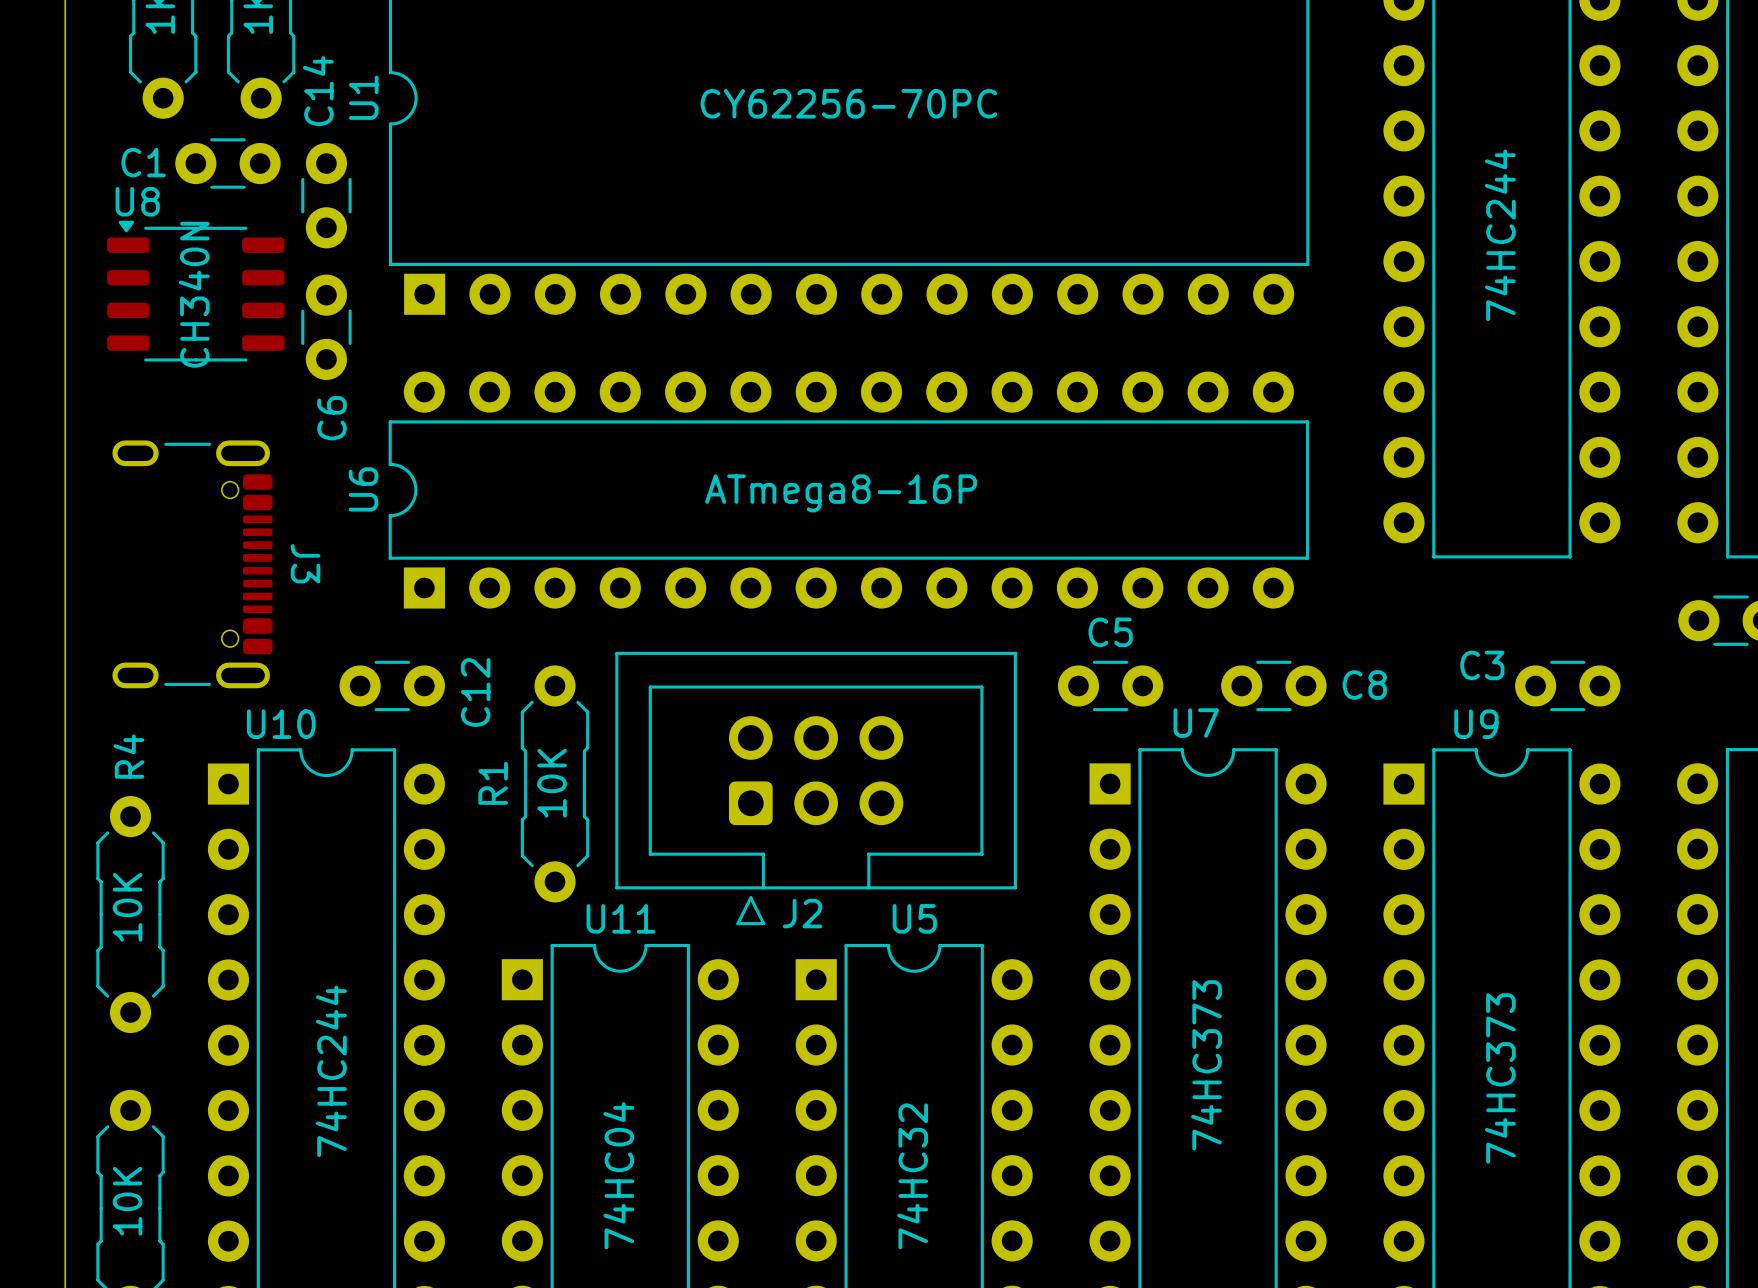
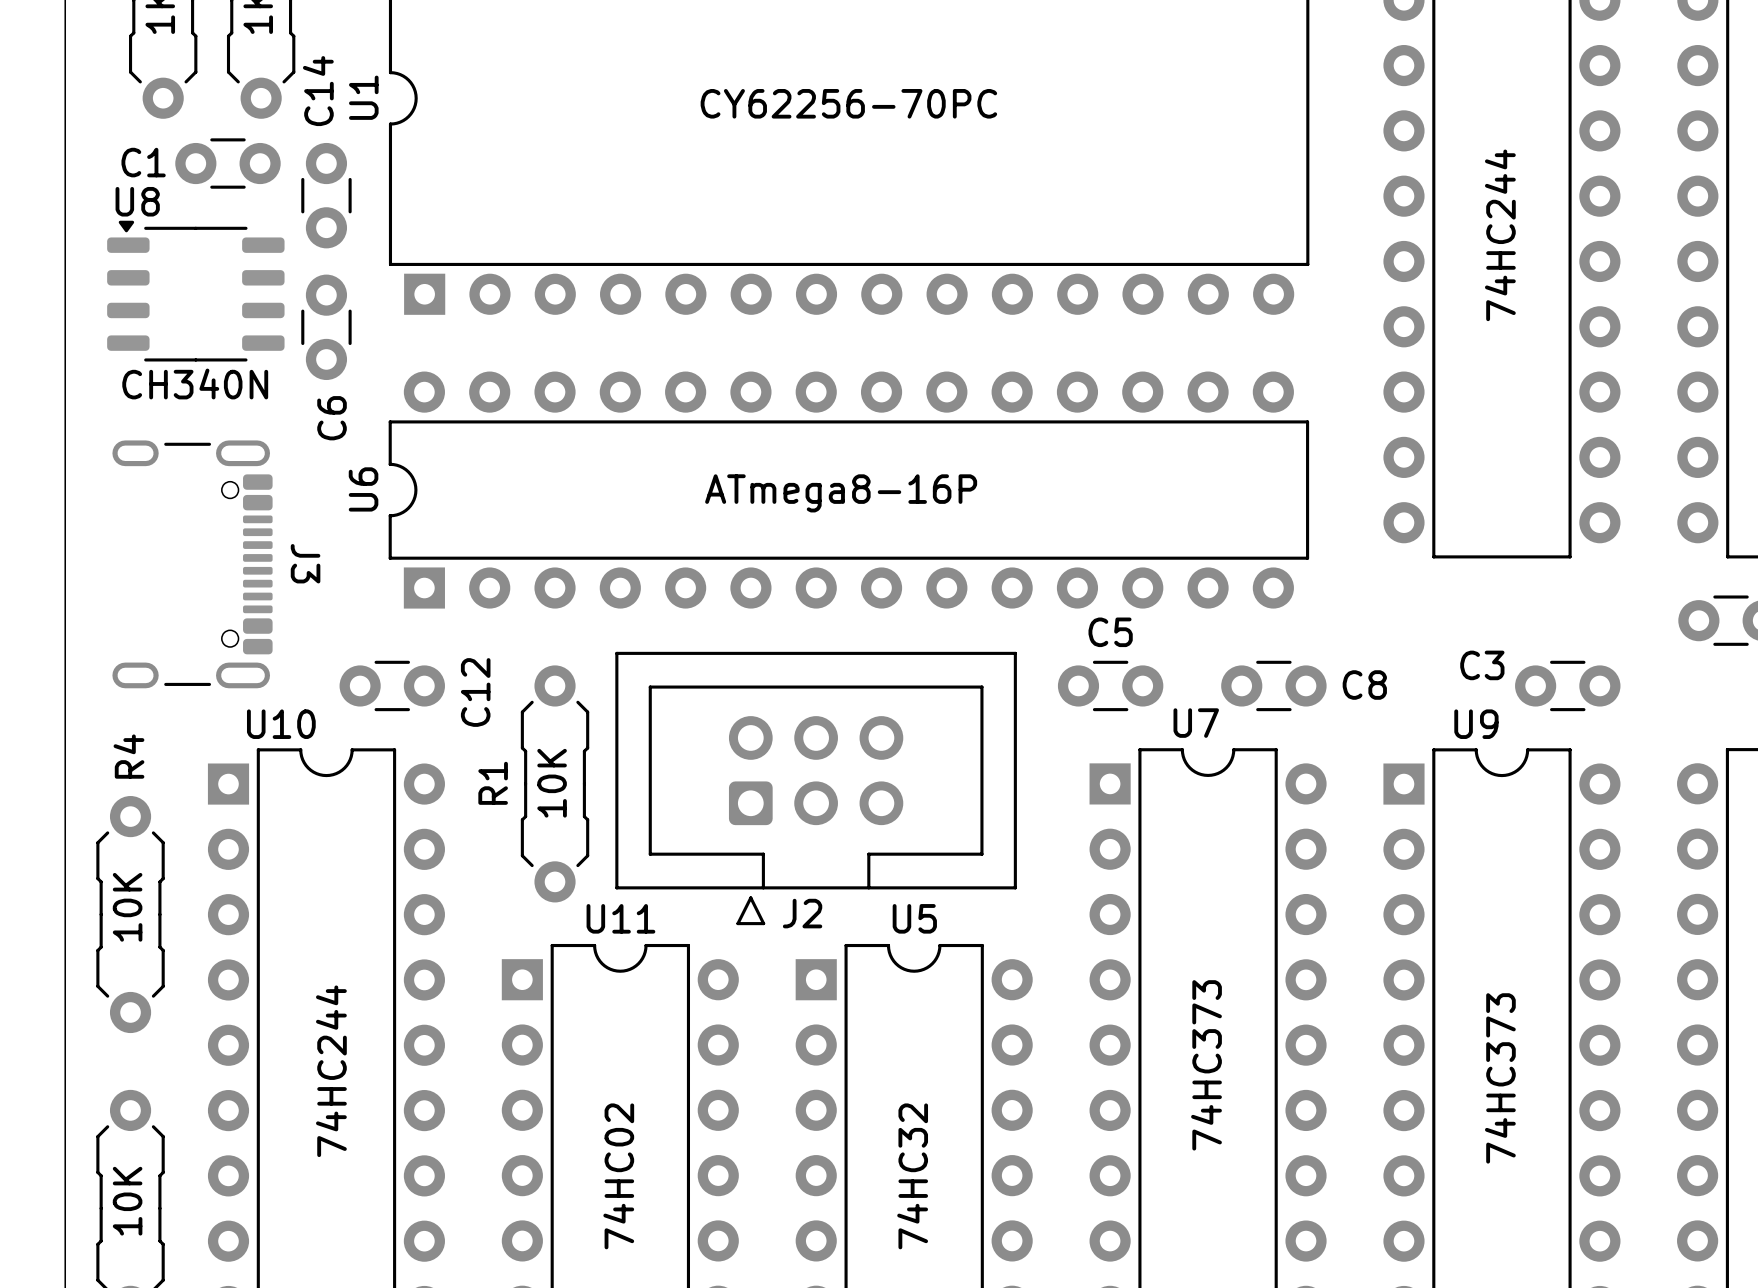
U8 value rotation: 0° (194, 294) -> 90° clockwise (195, 383)
U11 value: 74HC04 (618, 1175) -> 74HC02 (618, 1176)

